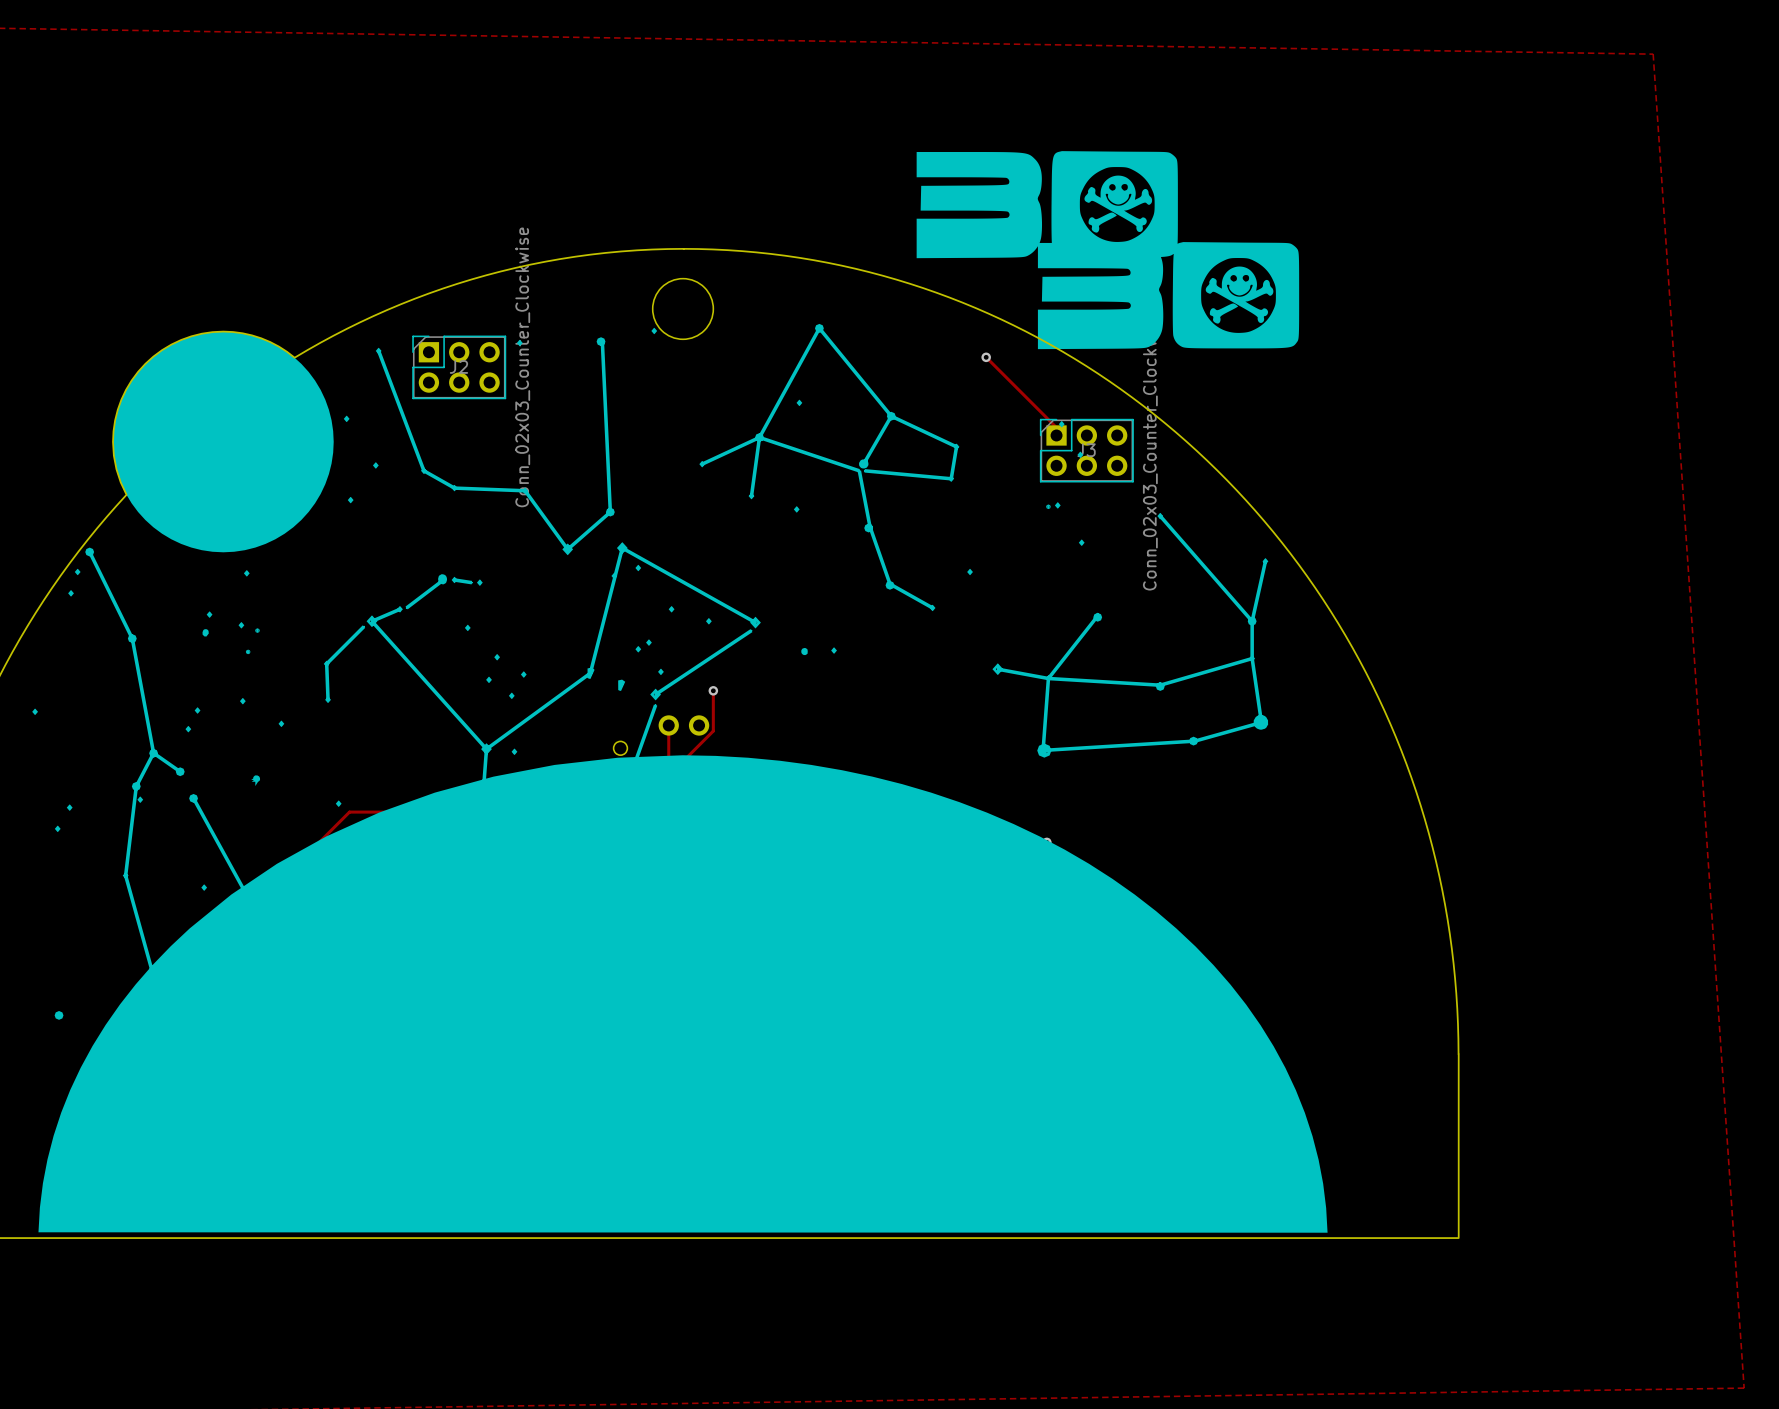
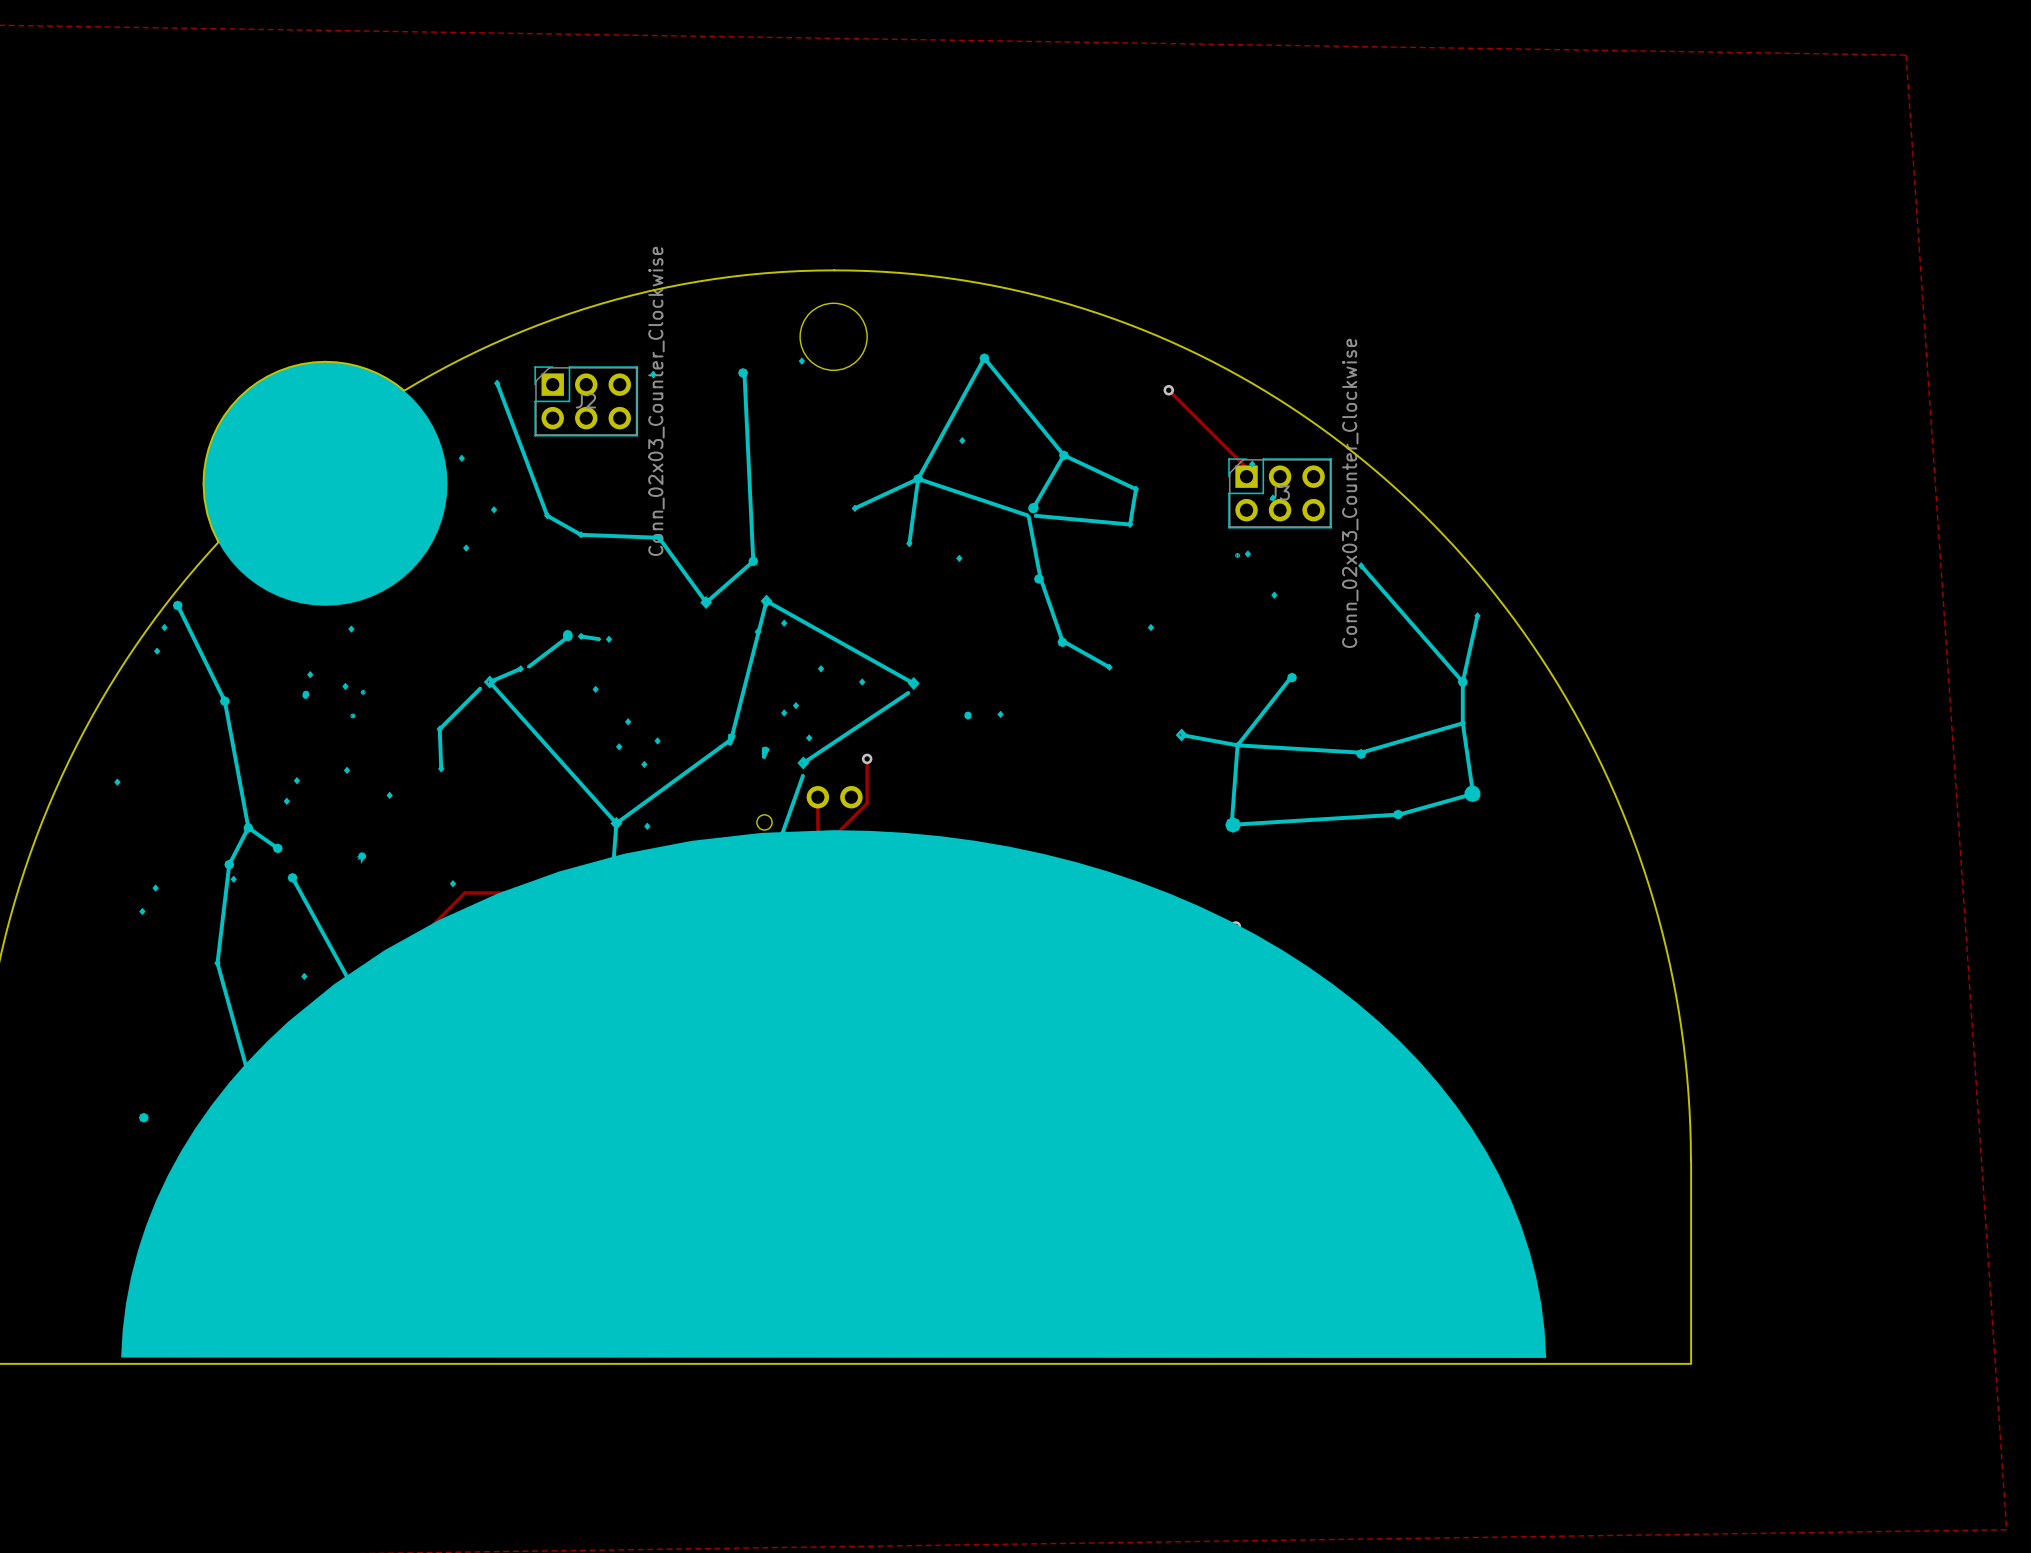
drawing: [916, 151, 1300, 350] -> none

